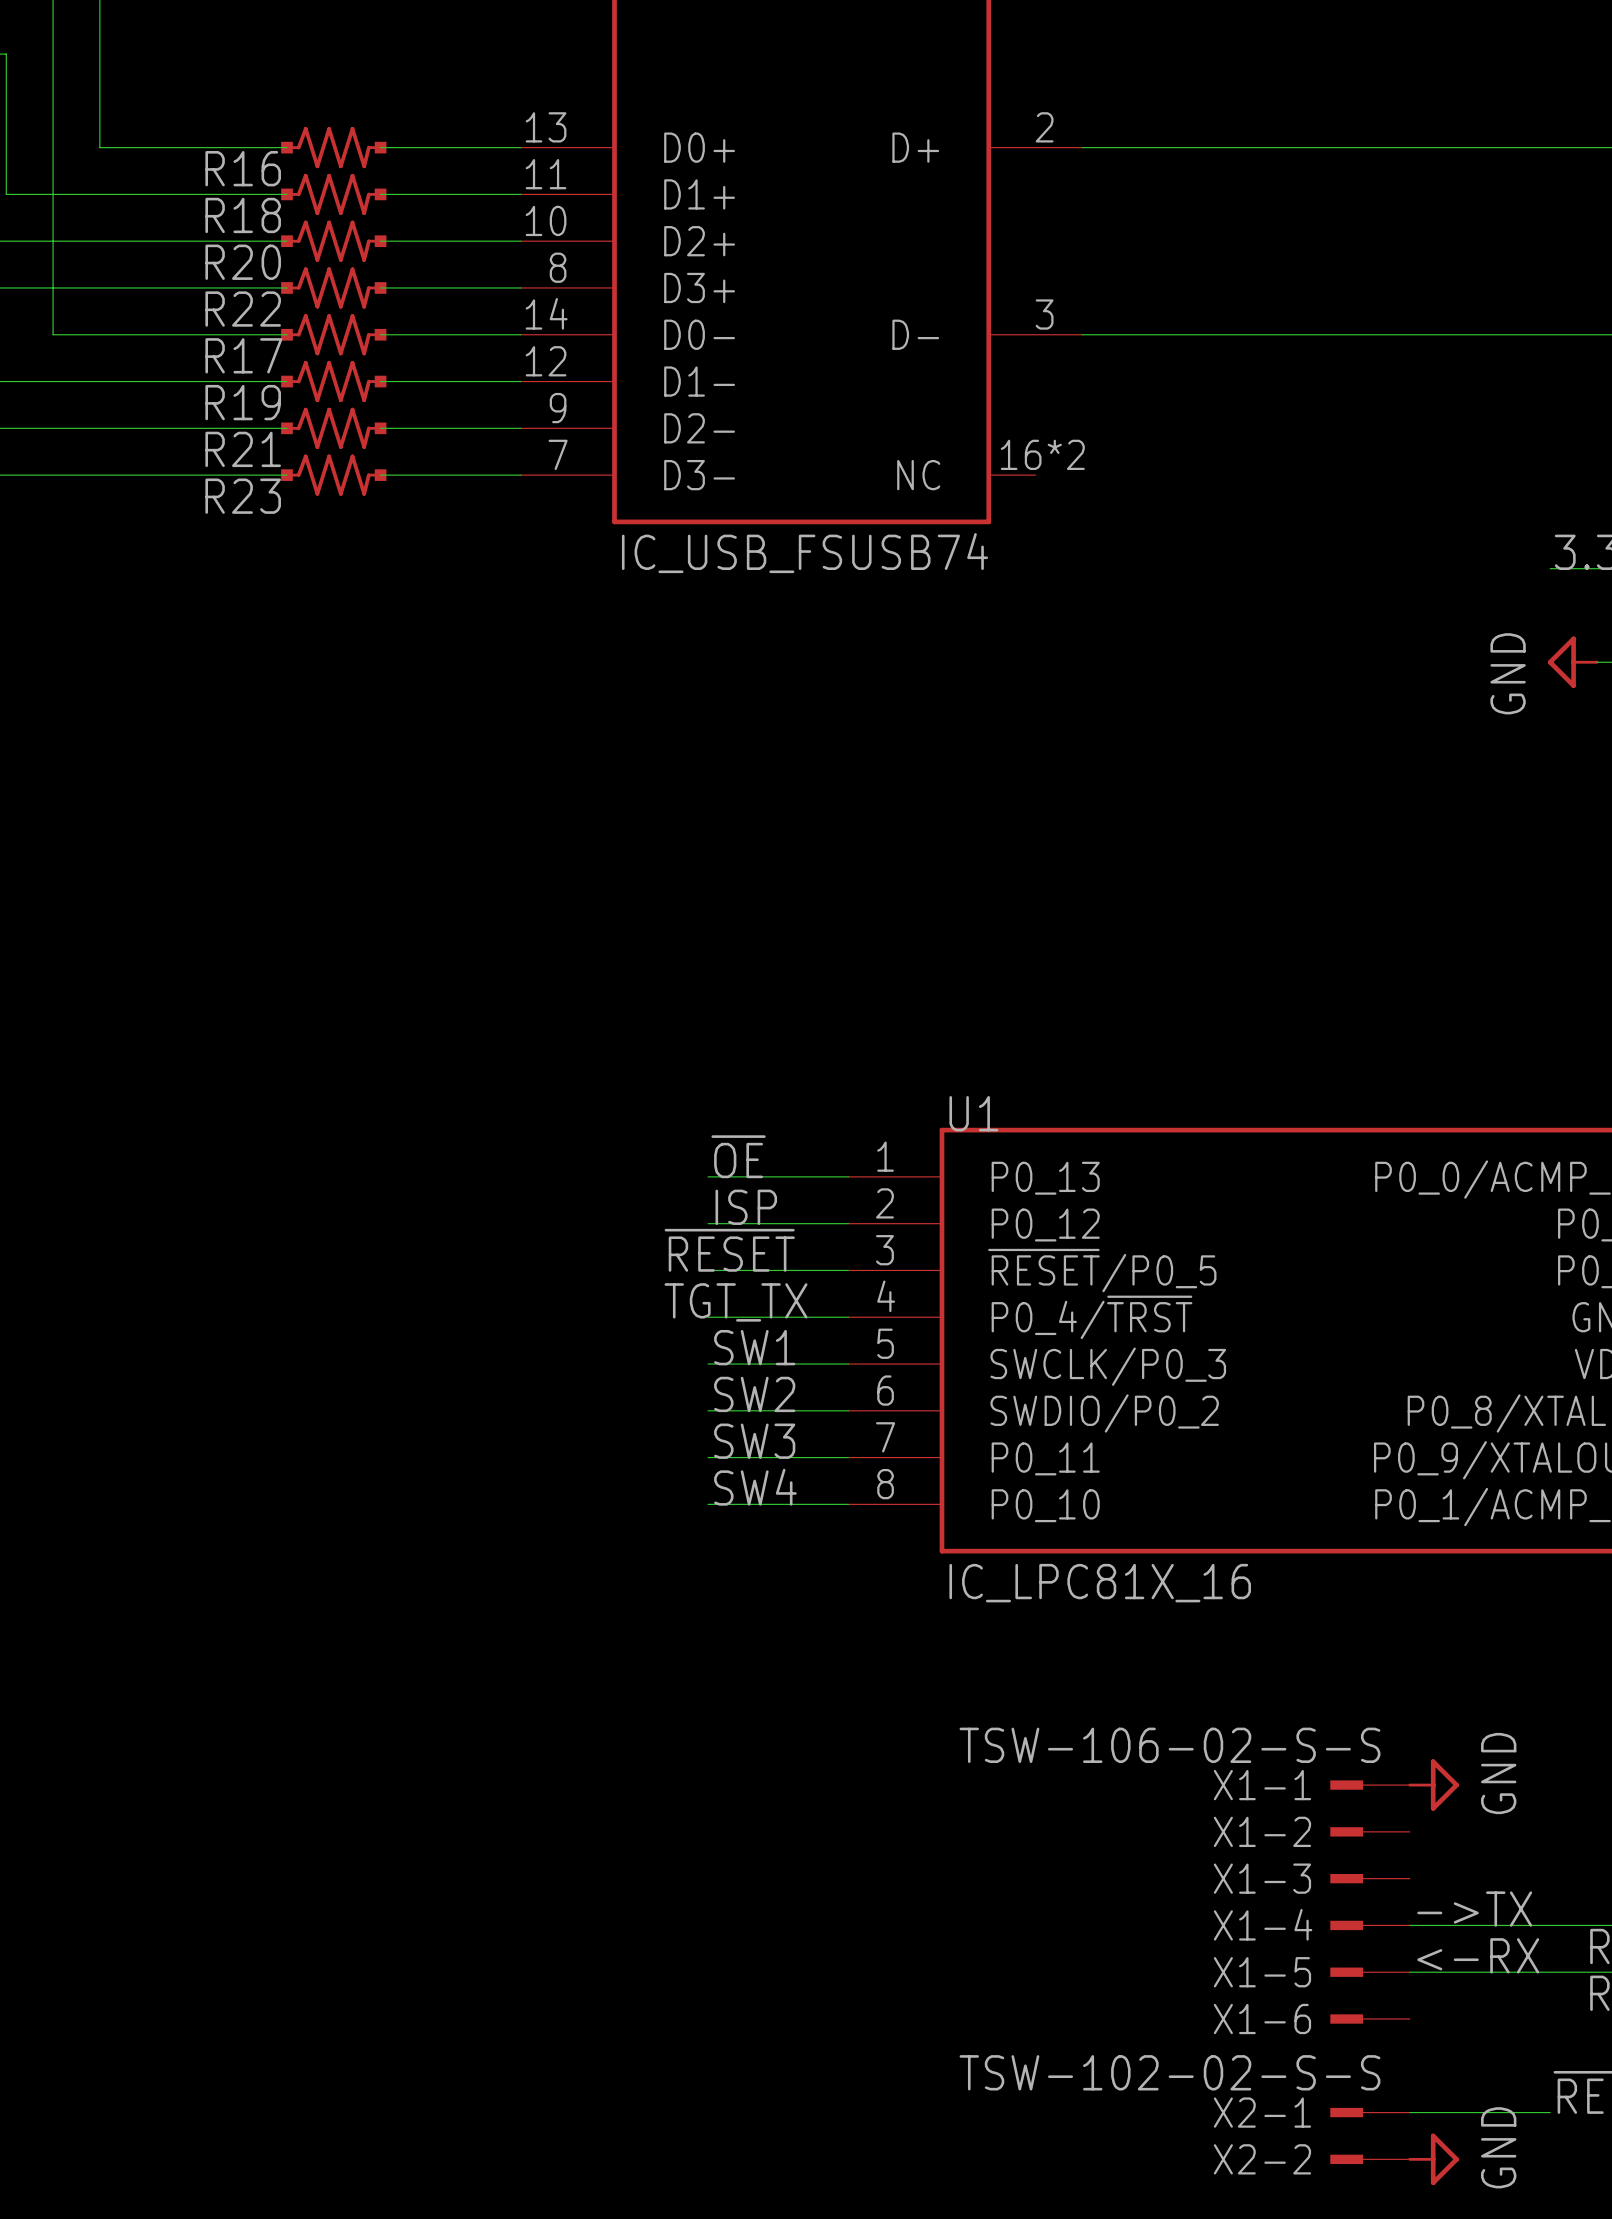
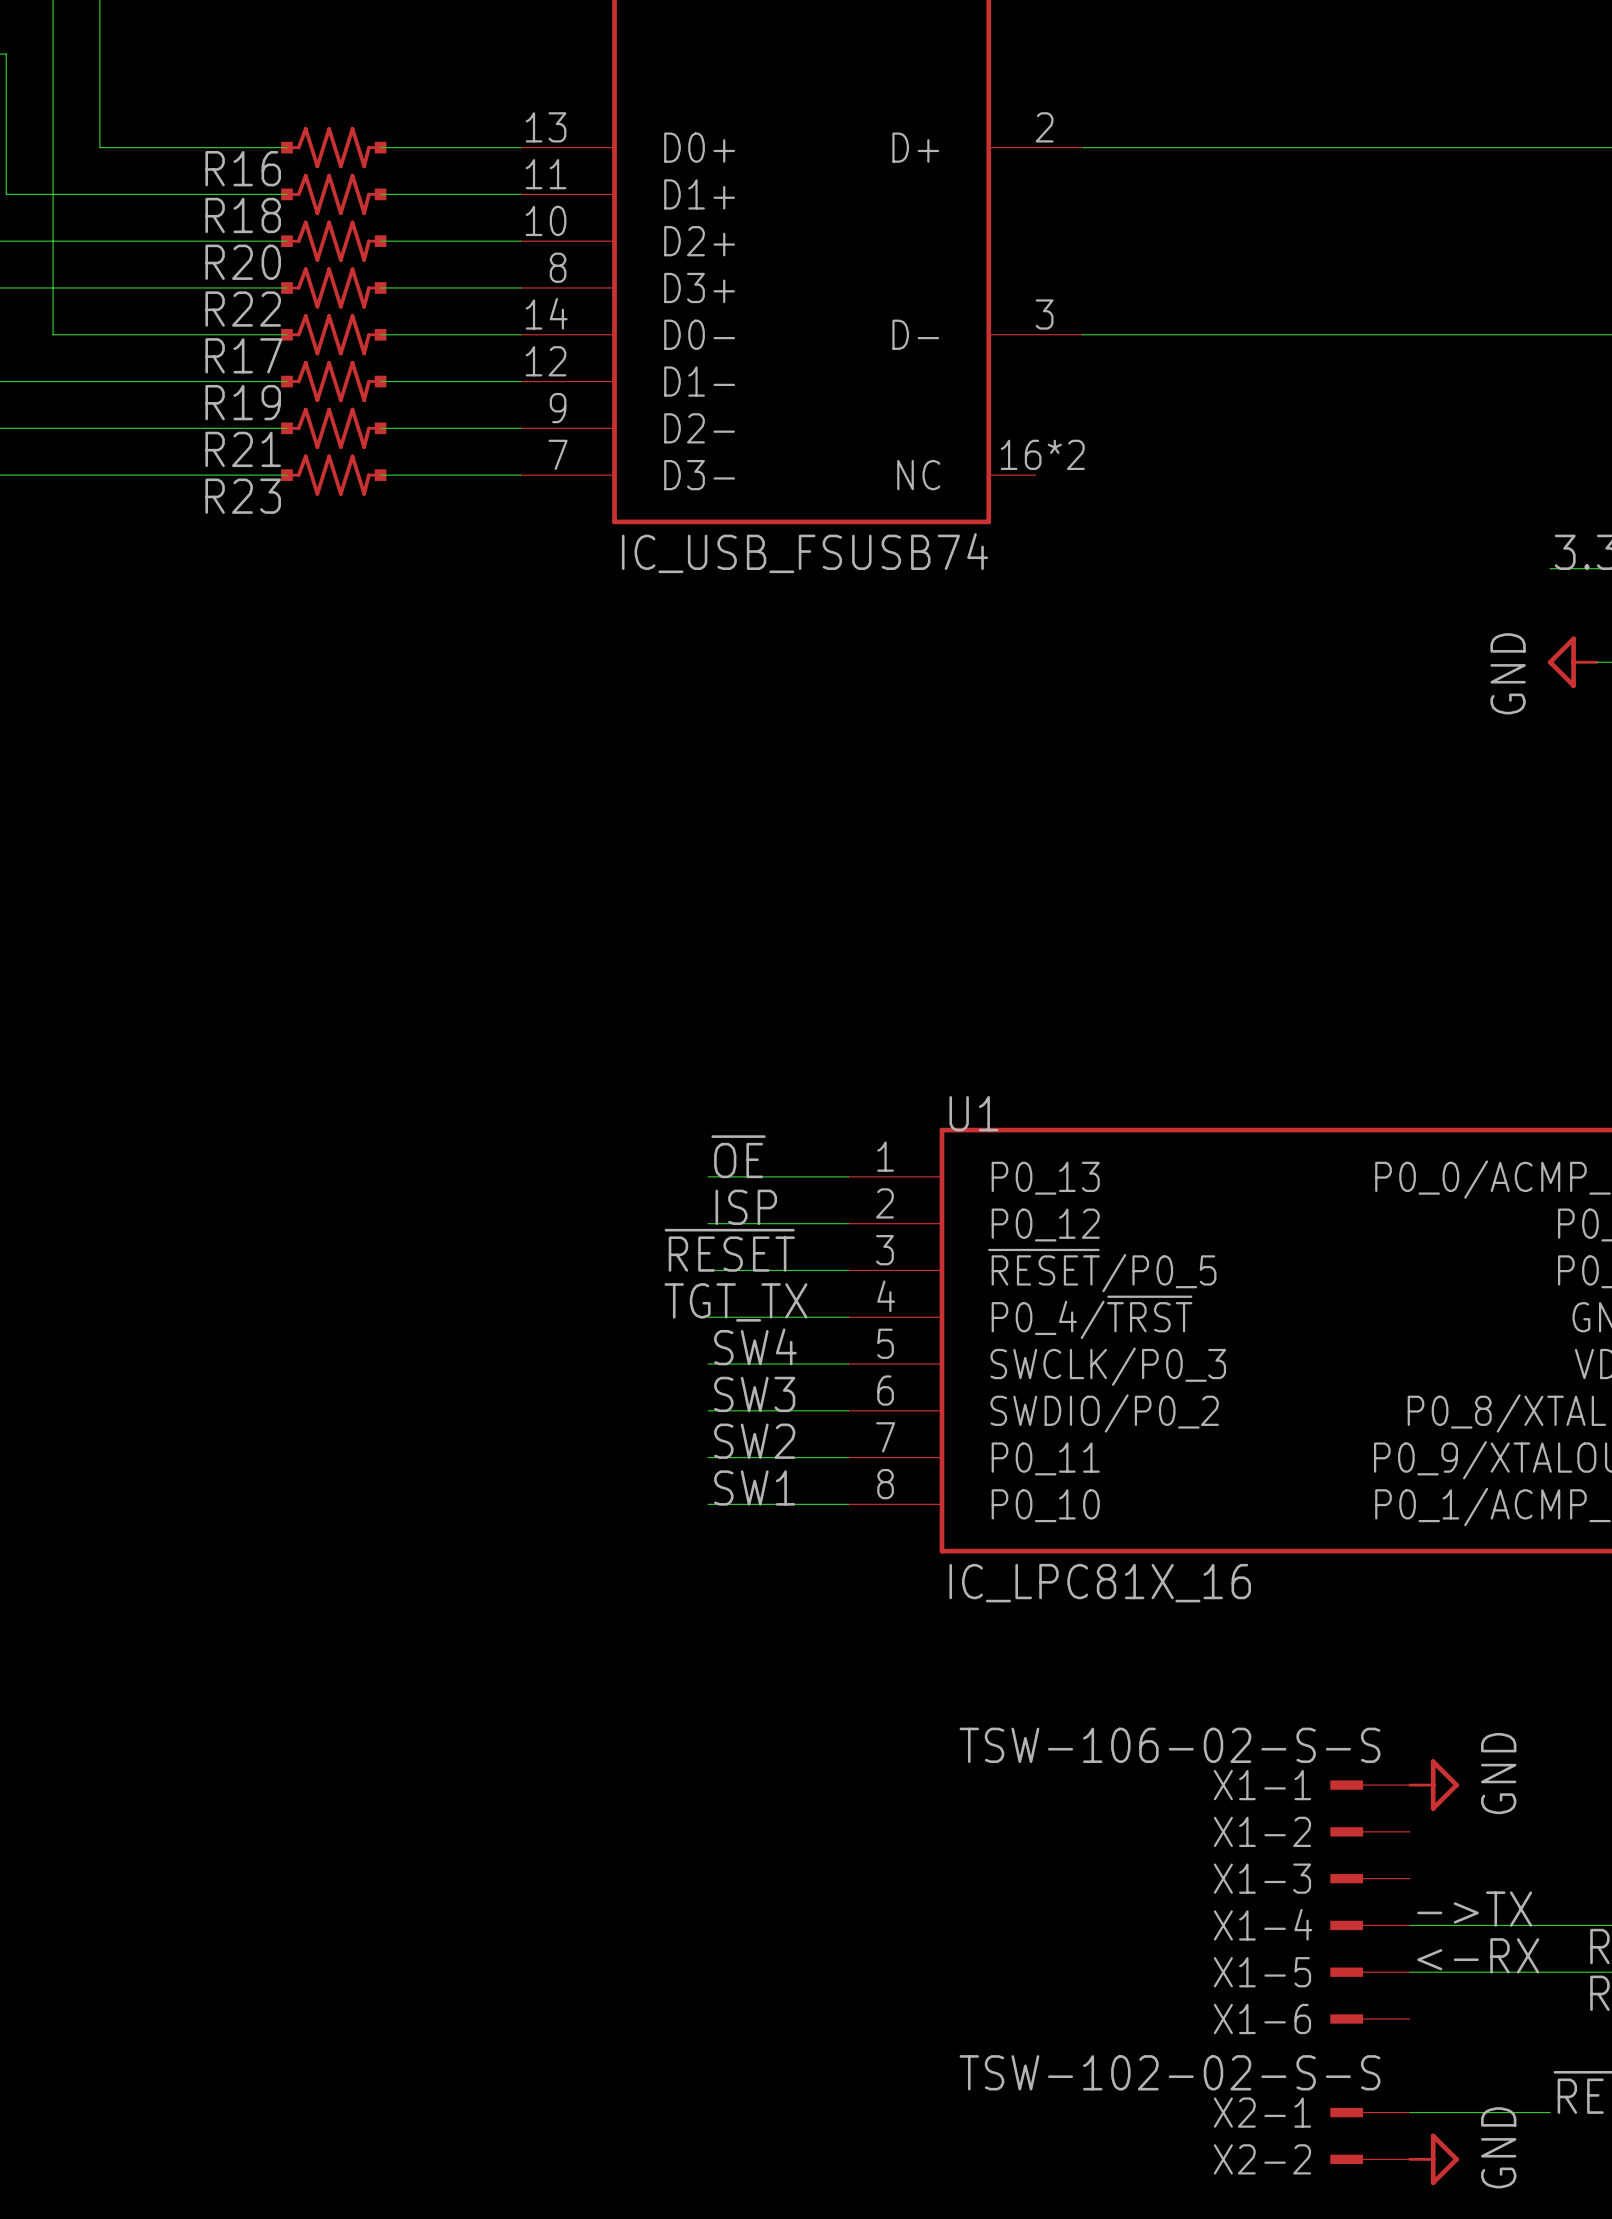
label: SW1 (754, 1347) -> SW4 (755, 1346)
label: SW2 (754, 1394) -> SW3 (754, 1394)
label: SW3 (754, 1441) -> SW2 (754, 1441)
label: SW4 (755, 1487) -> SW1 (754, 1488)

